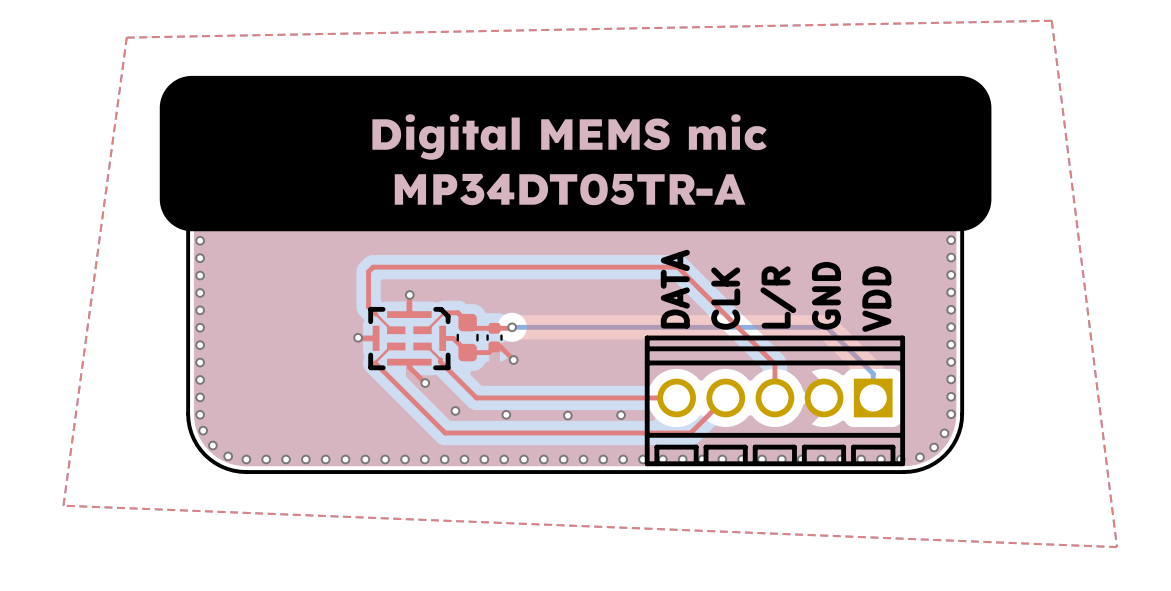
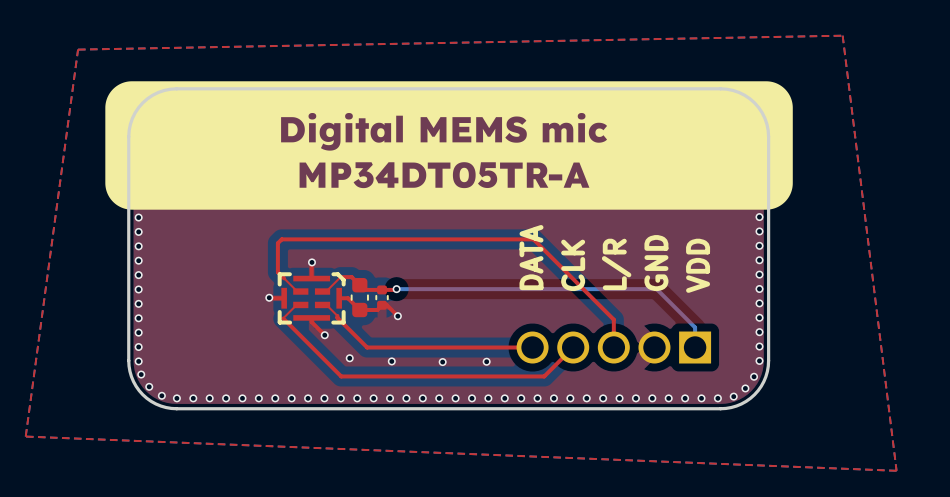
part footprint: [644, 335, 906, 467] -> [516, 331, 712, 364]

